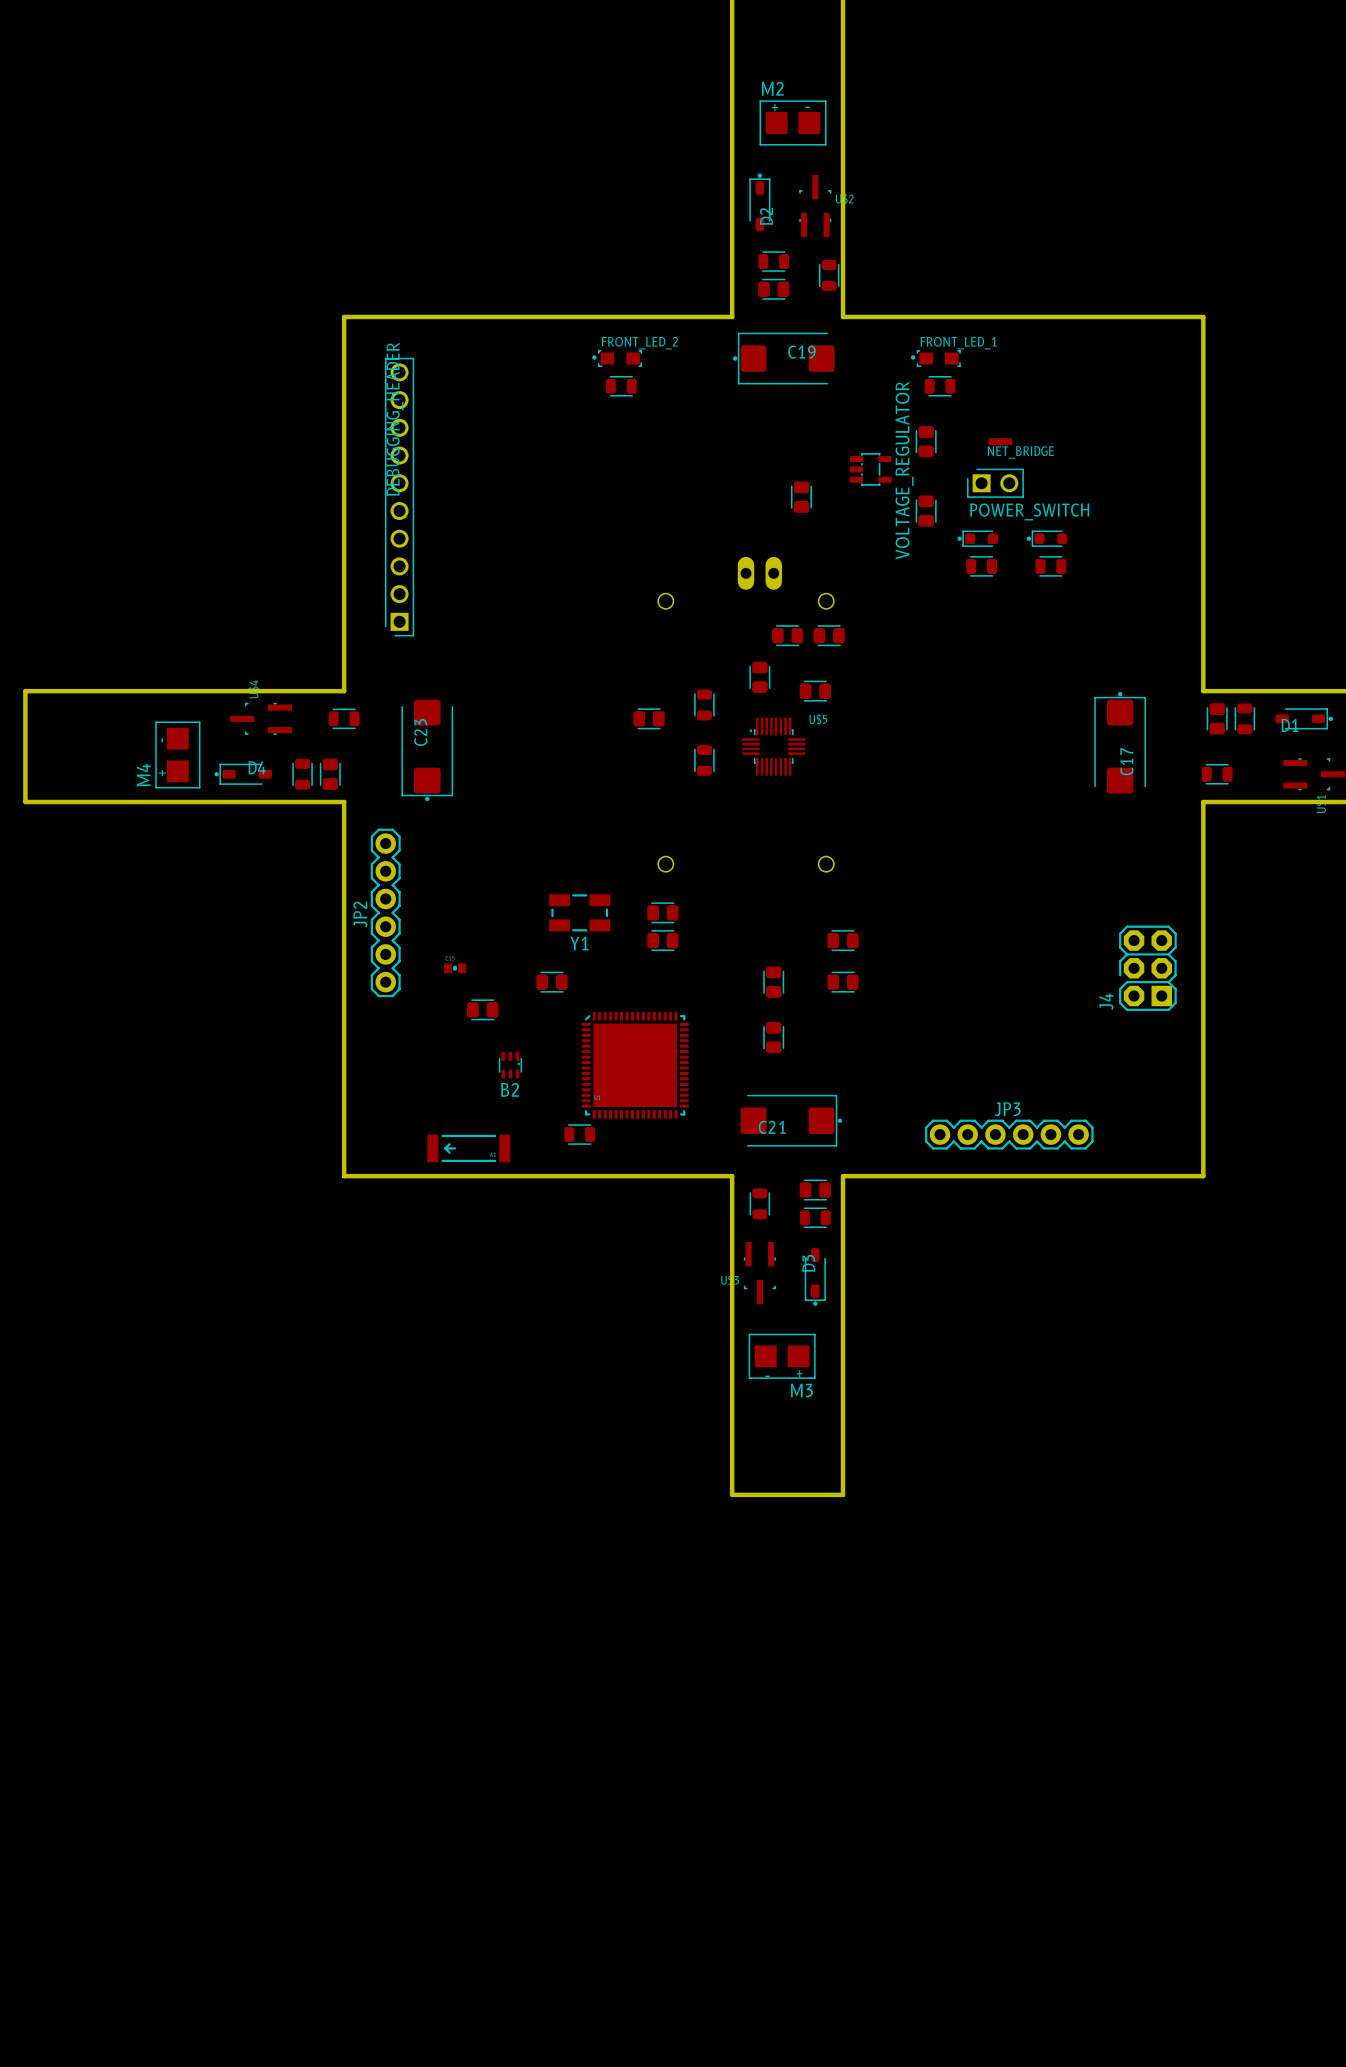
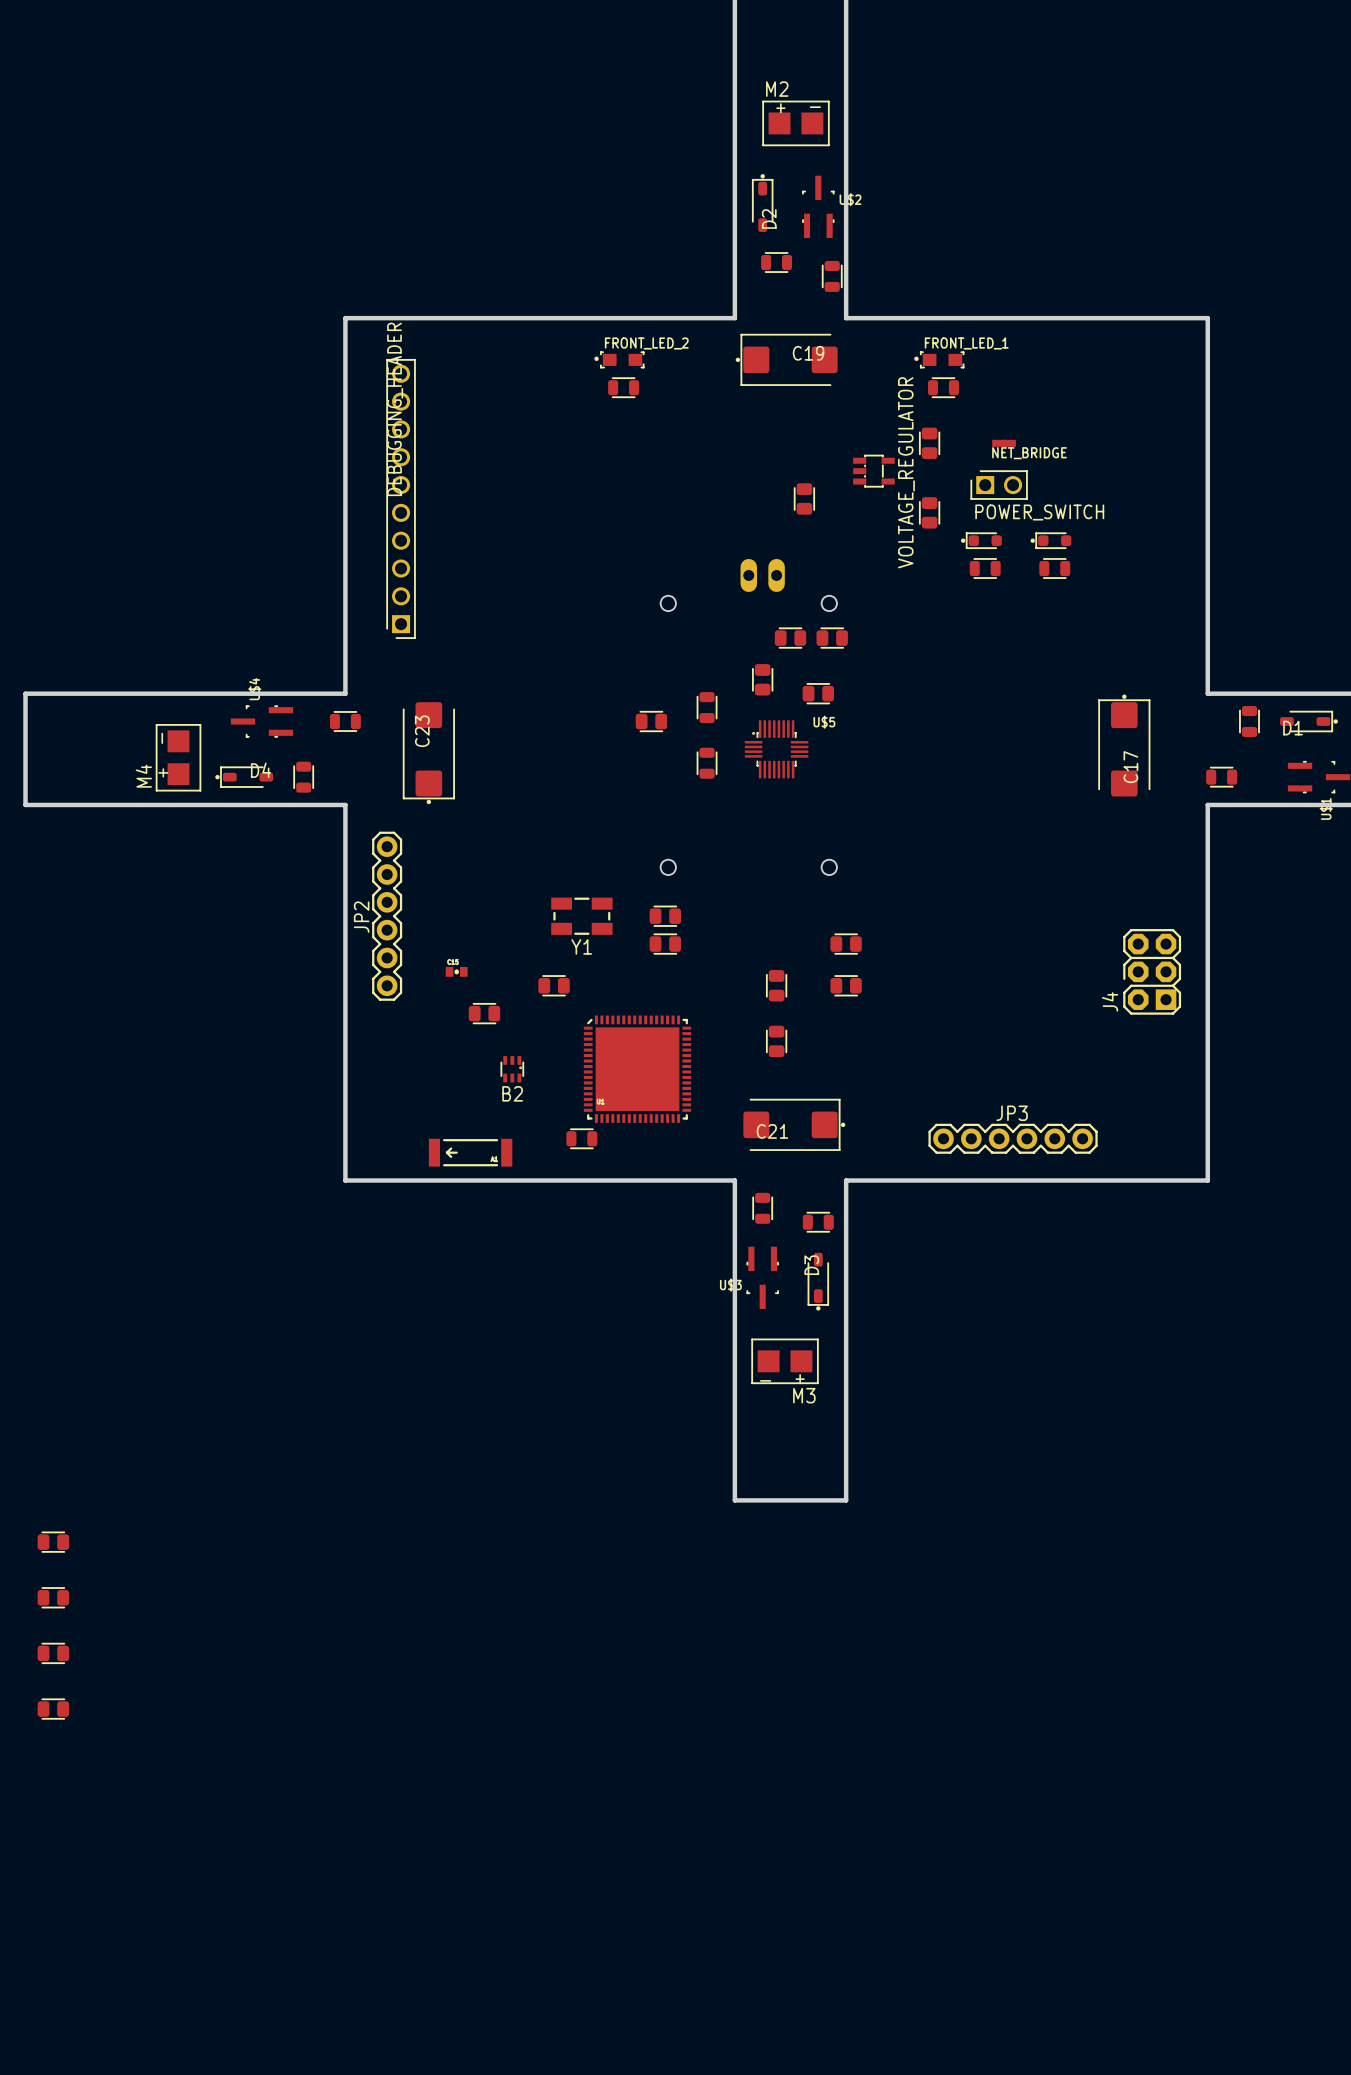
part: (773, 289) -> none
part: (1217, 718) -> none
part: (330, 774) -> none
part: (815, 1190) -> none
part: none -> (53, 1542)
part: none -> (53, 1597)
part: none -> (53, 1653)
part: none -> (53, 1709)

